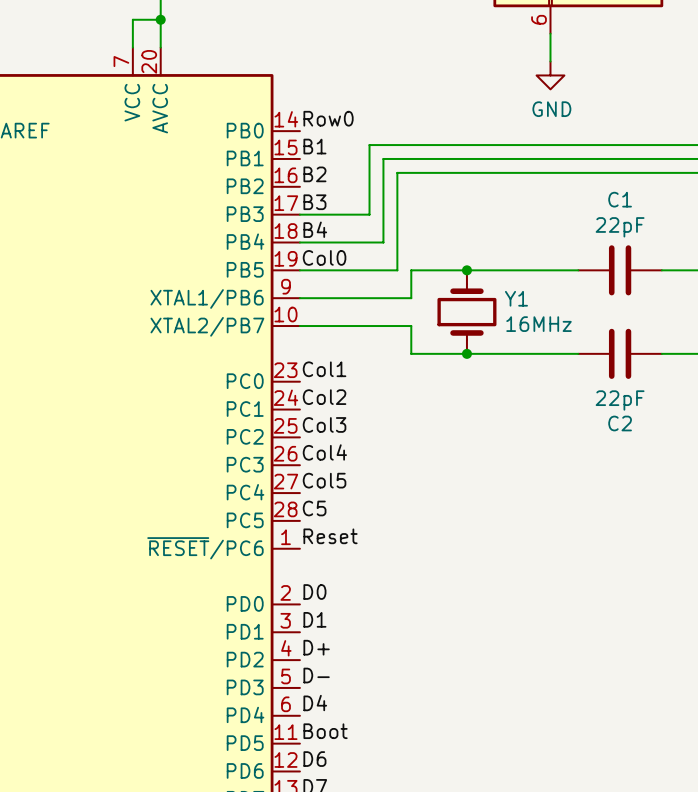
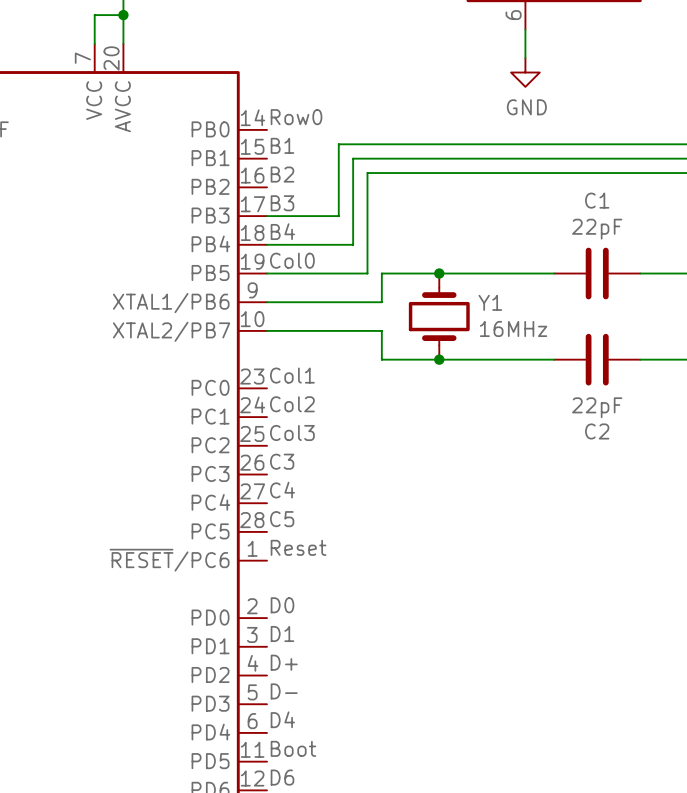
label: Col4 (324, 452) -> C3 (282, 461)
label: Col5 (324, 480) -> C4 (282, 490)

